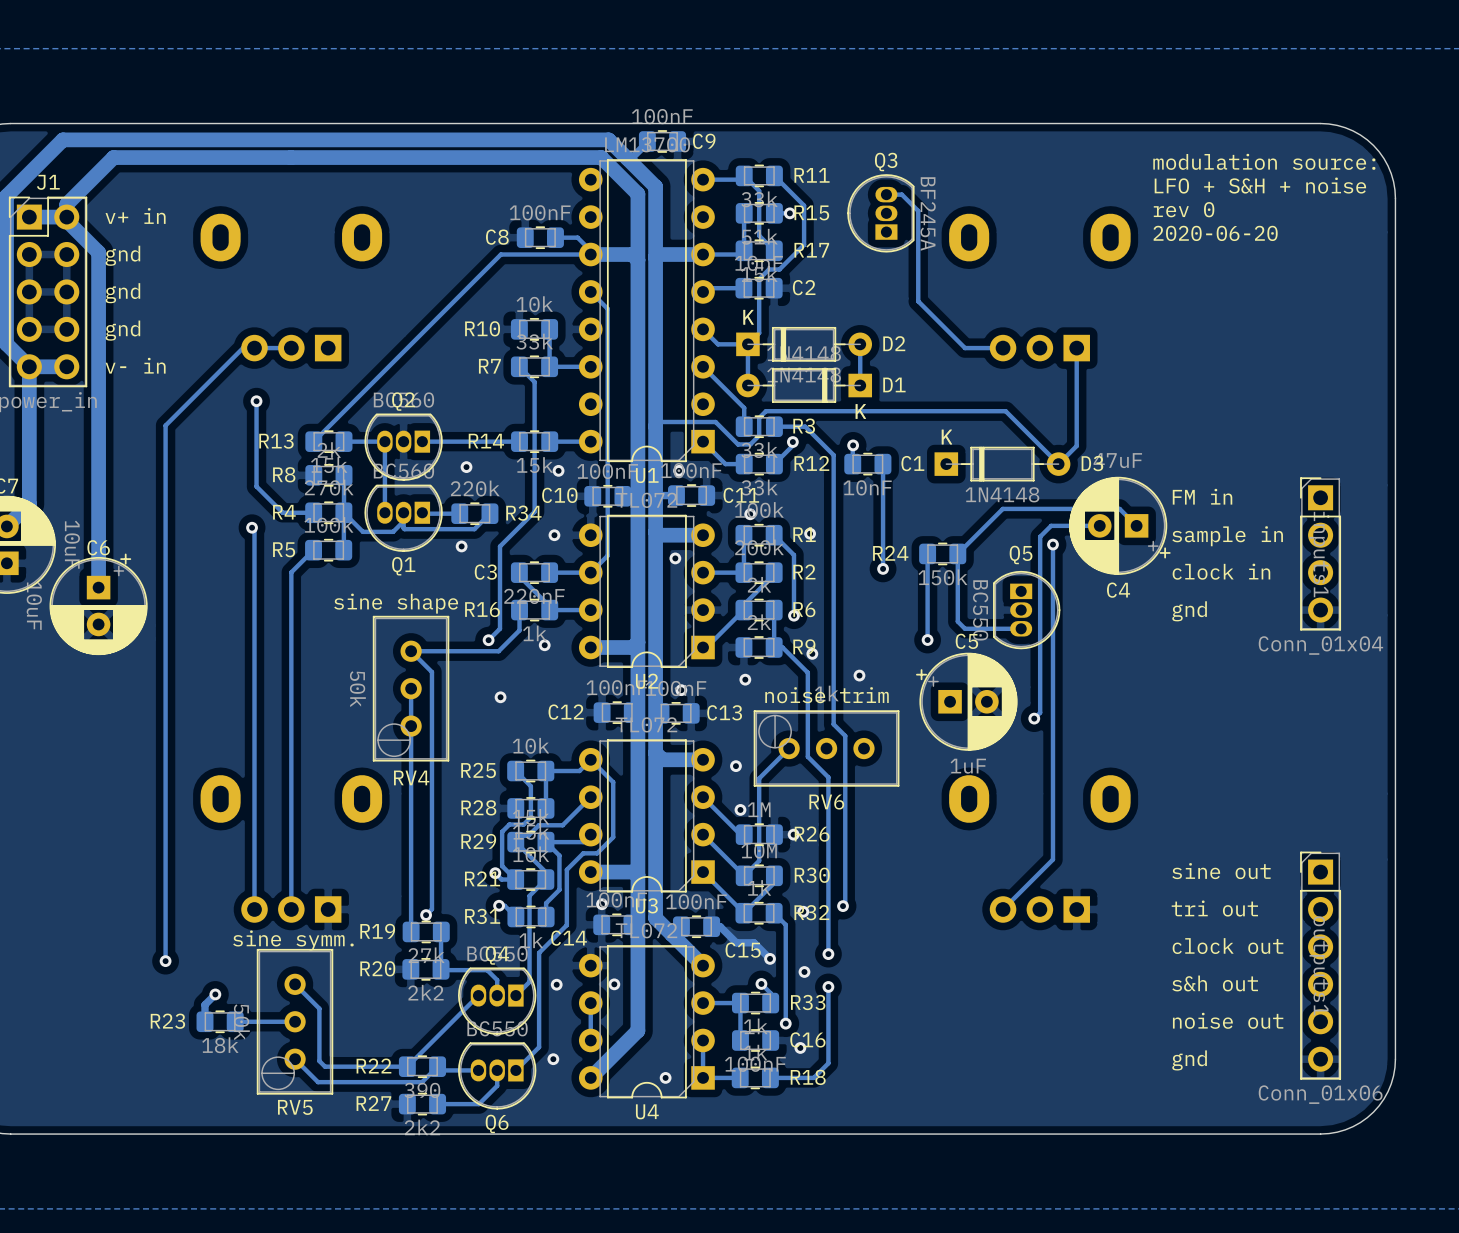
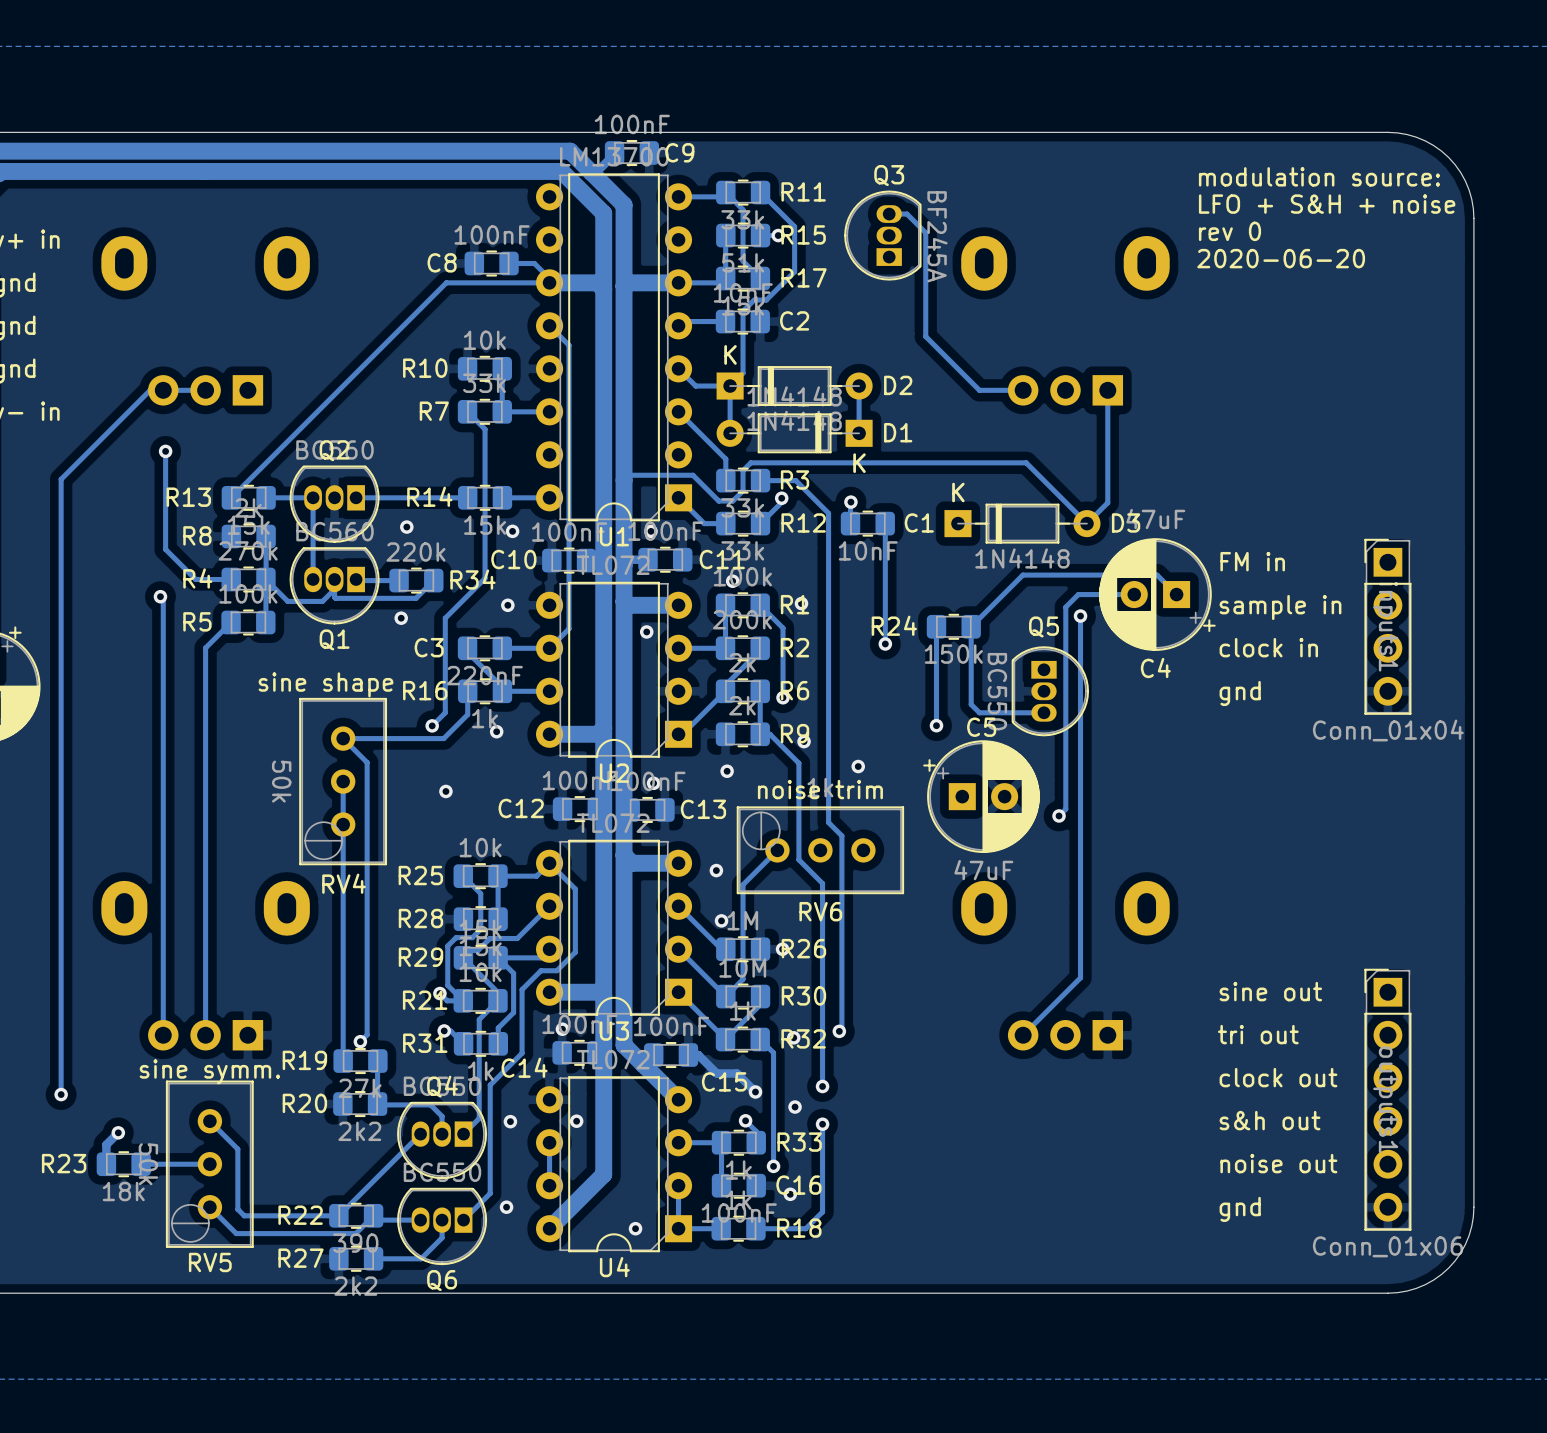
C5 value: 1uF (968, 766) -> 47uF (983, 870)

